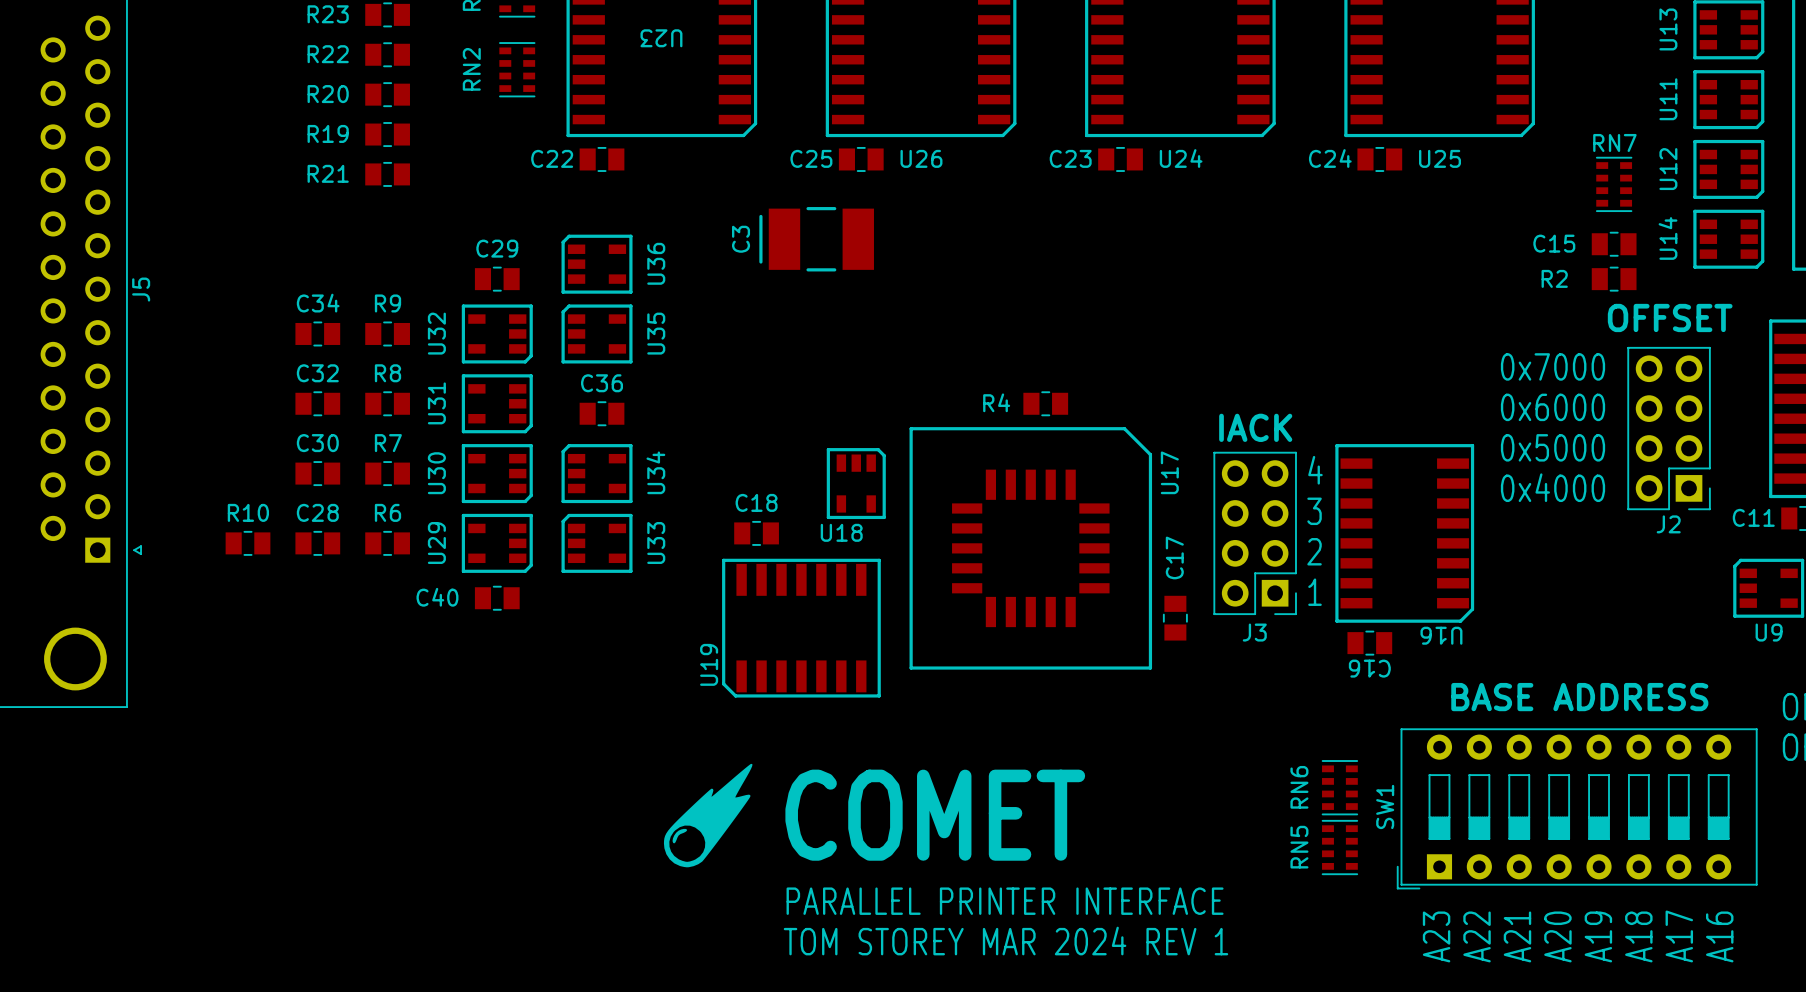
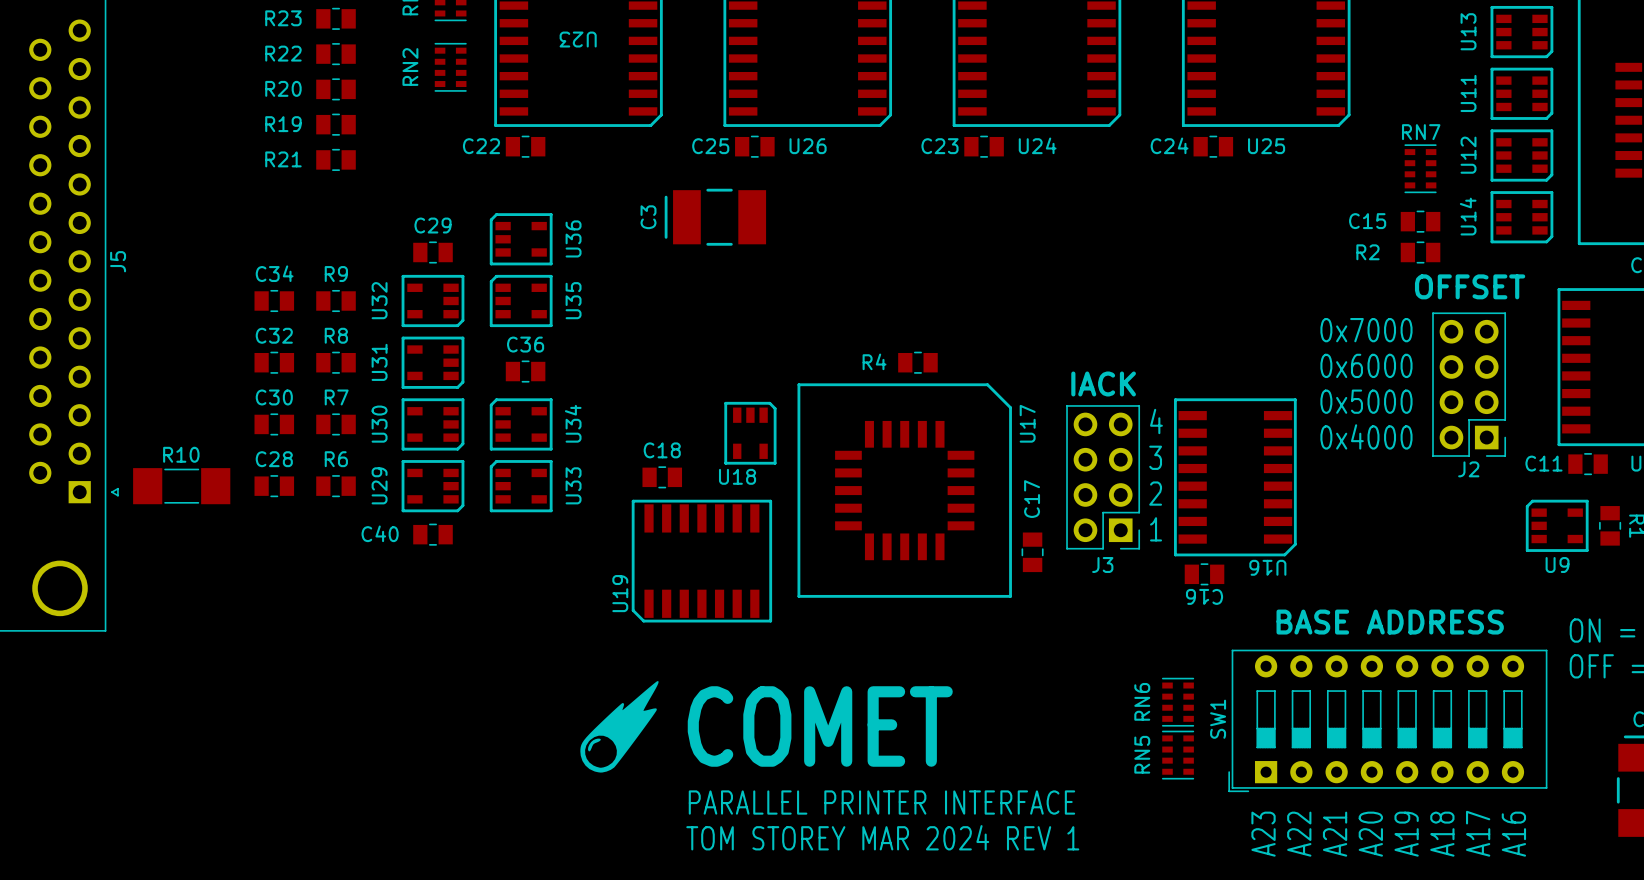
R10 footprint: [225, 530, 271, 556] -> [133, 468, 231, 505]

